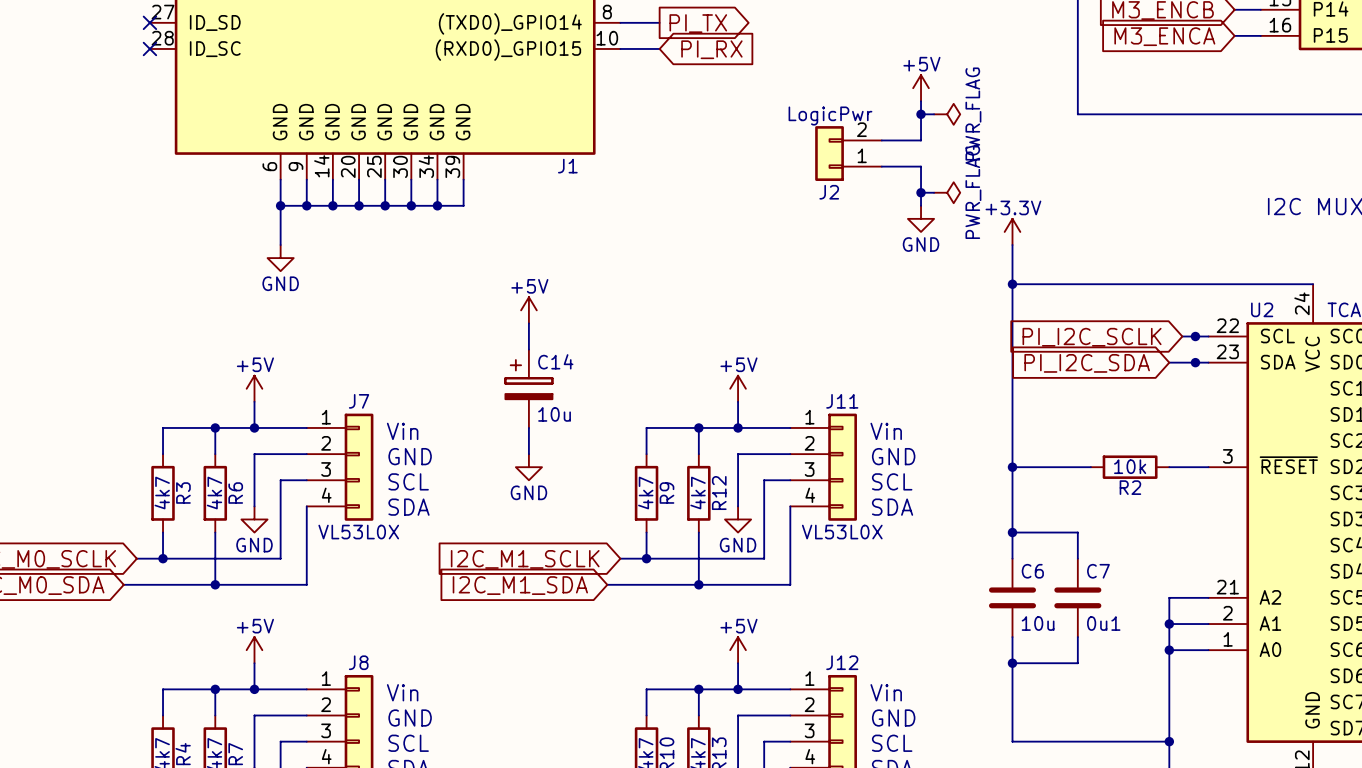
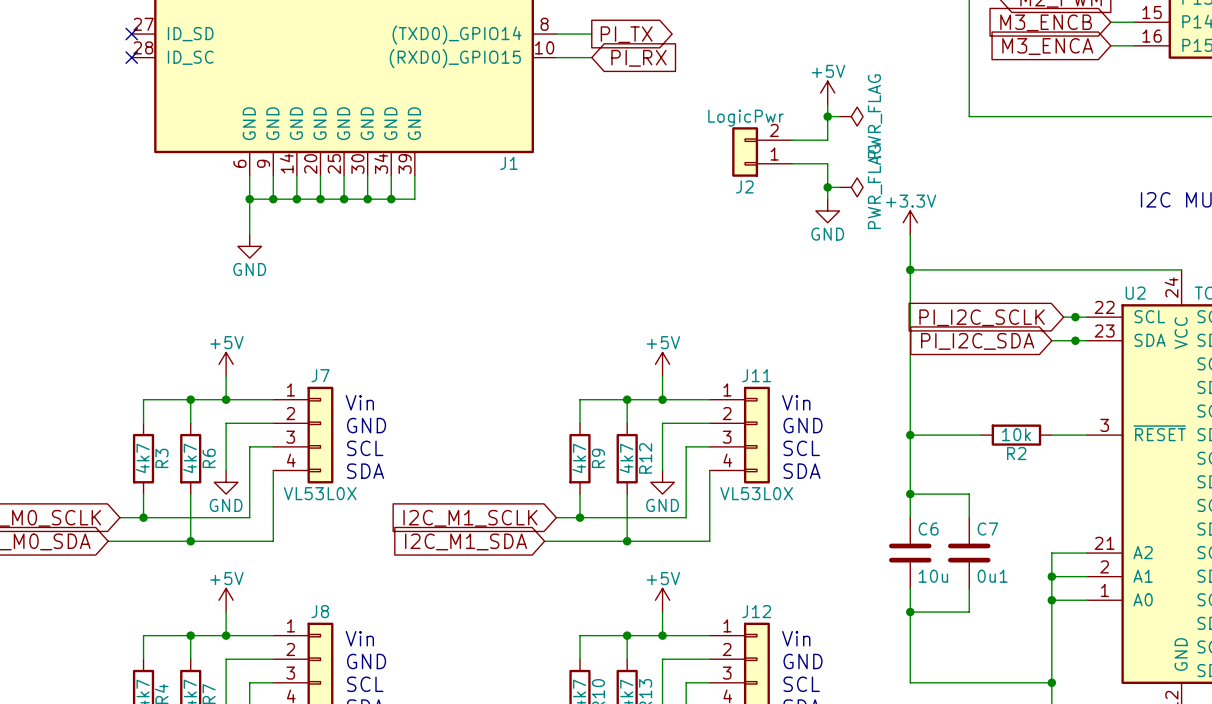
power symbol: +5V (528, 310) -> none
wire: (528, 323) (528, 349) -> none
C14: 10u (528, 388) -> none
wire: (528, 427) (528, 454) -> none
power symbol: GND (528, 467) -> none

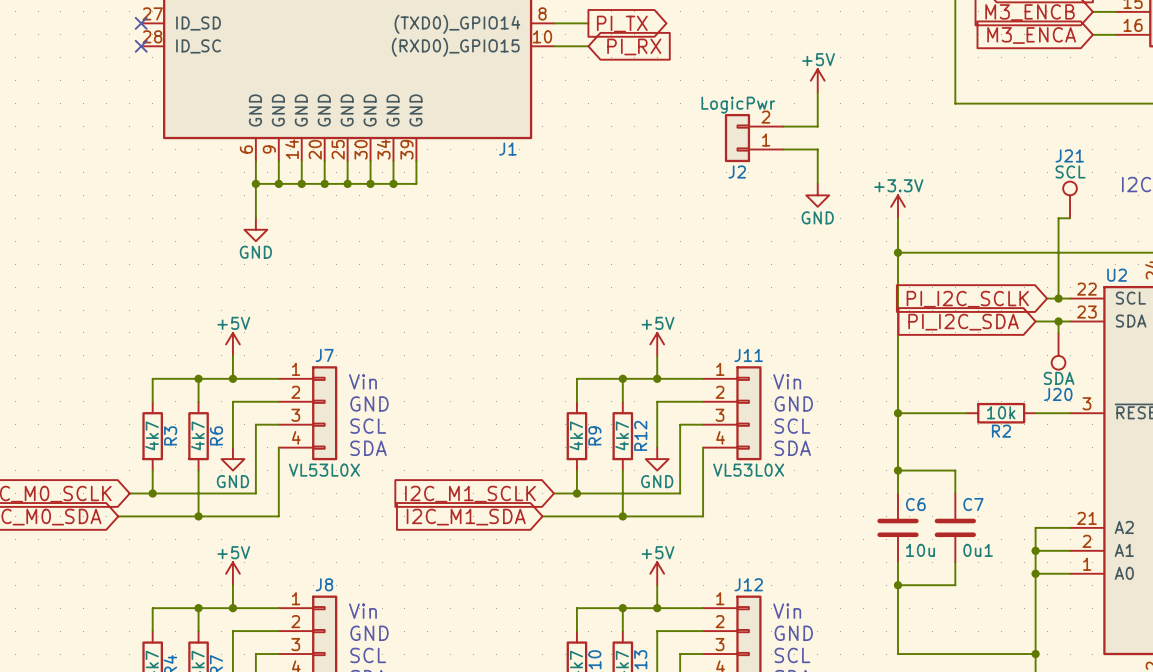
wire: (827, 116) (839, 116) -> none
junction: (827, 116) -> none
power symbol: PWR_FLAG (851, 116) -> none
wire: (827, 187) (839, 187) -> none
junction: (827, 187) -> none
power symbol: PWR_FLAG (851, 187) -> none
J21: none -> SCL (1070, 199)
wire: none -> (1070, 218) (1058, 218) (1058, 298)
wire: none -> (1058, 321) (1058, 332)
J20: none -> SDA (1058, 351)

